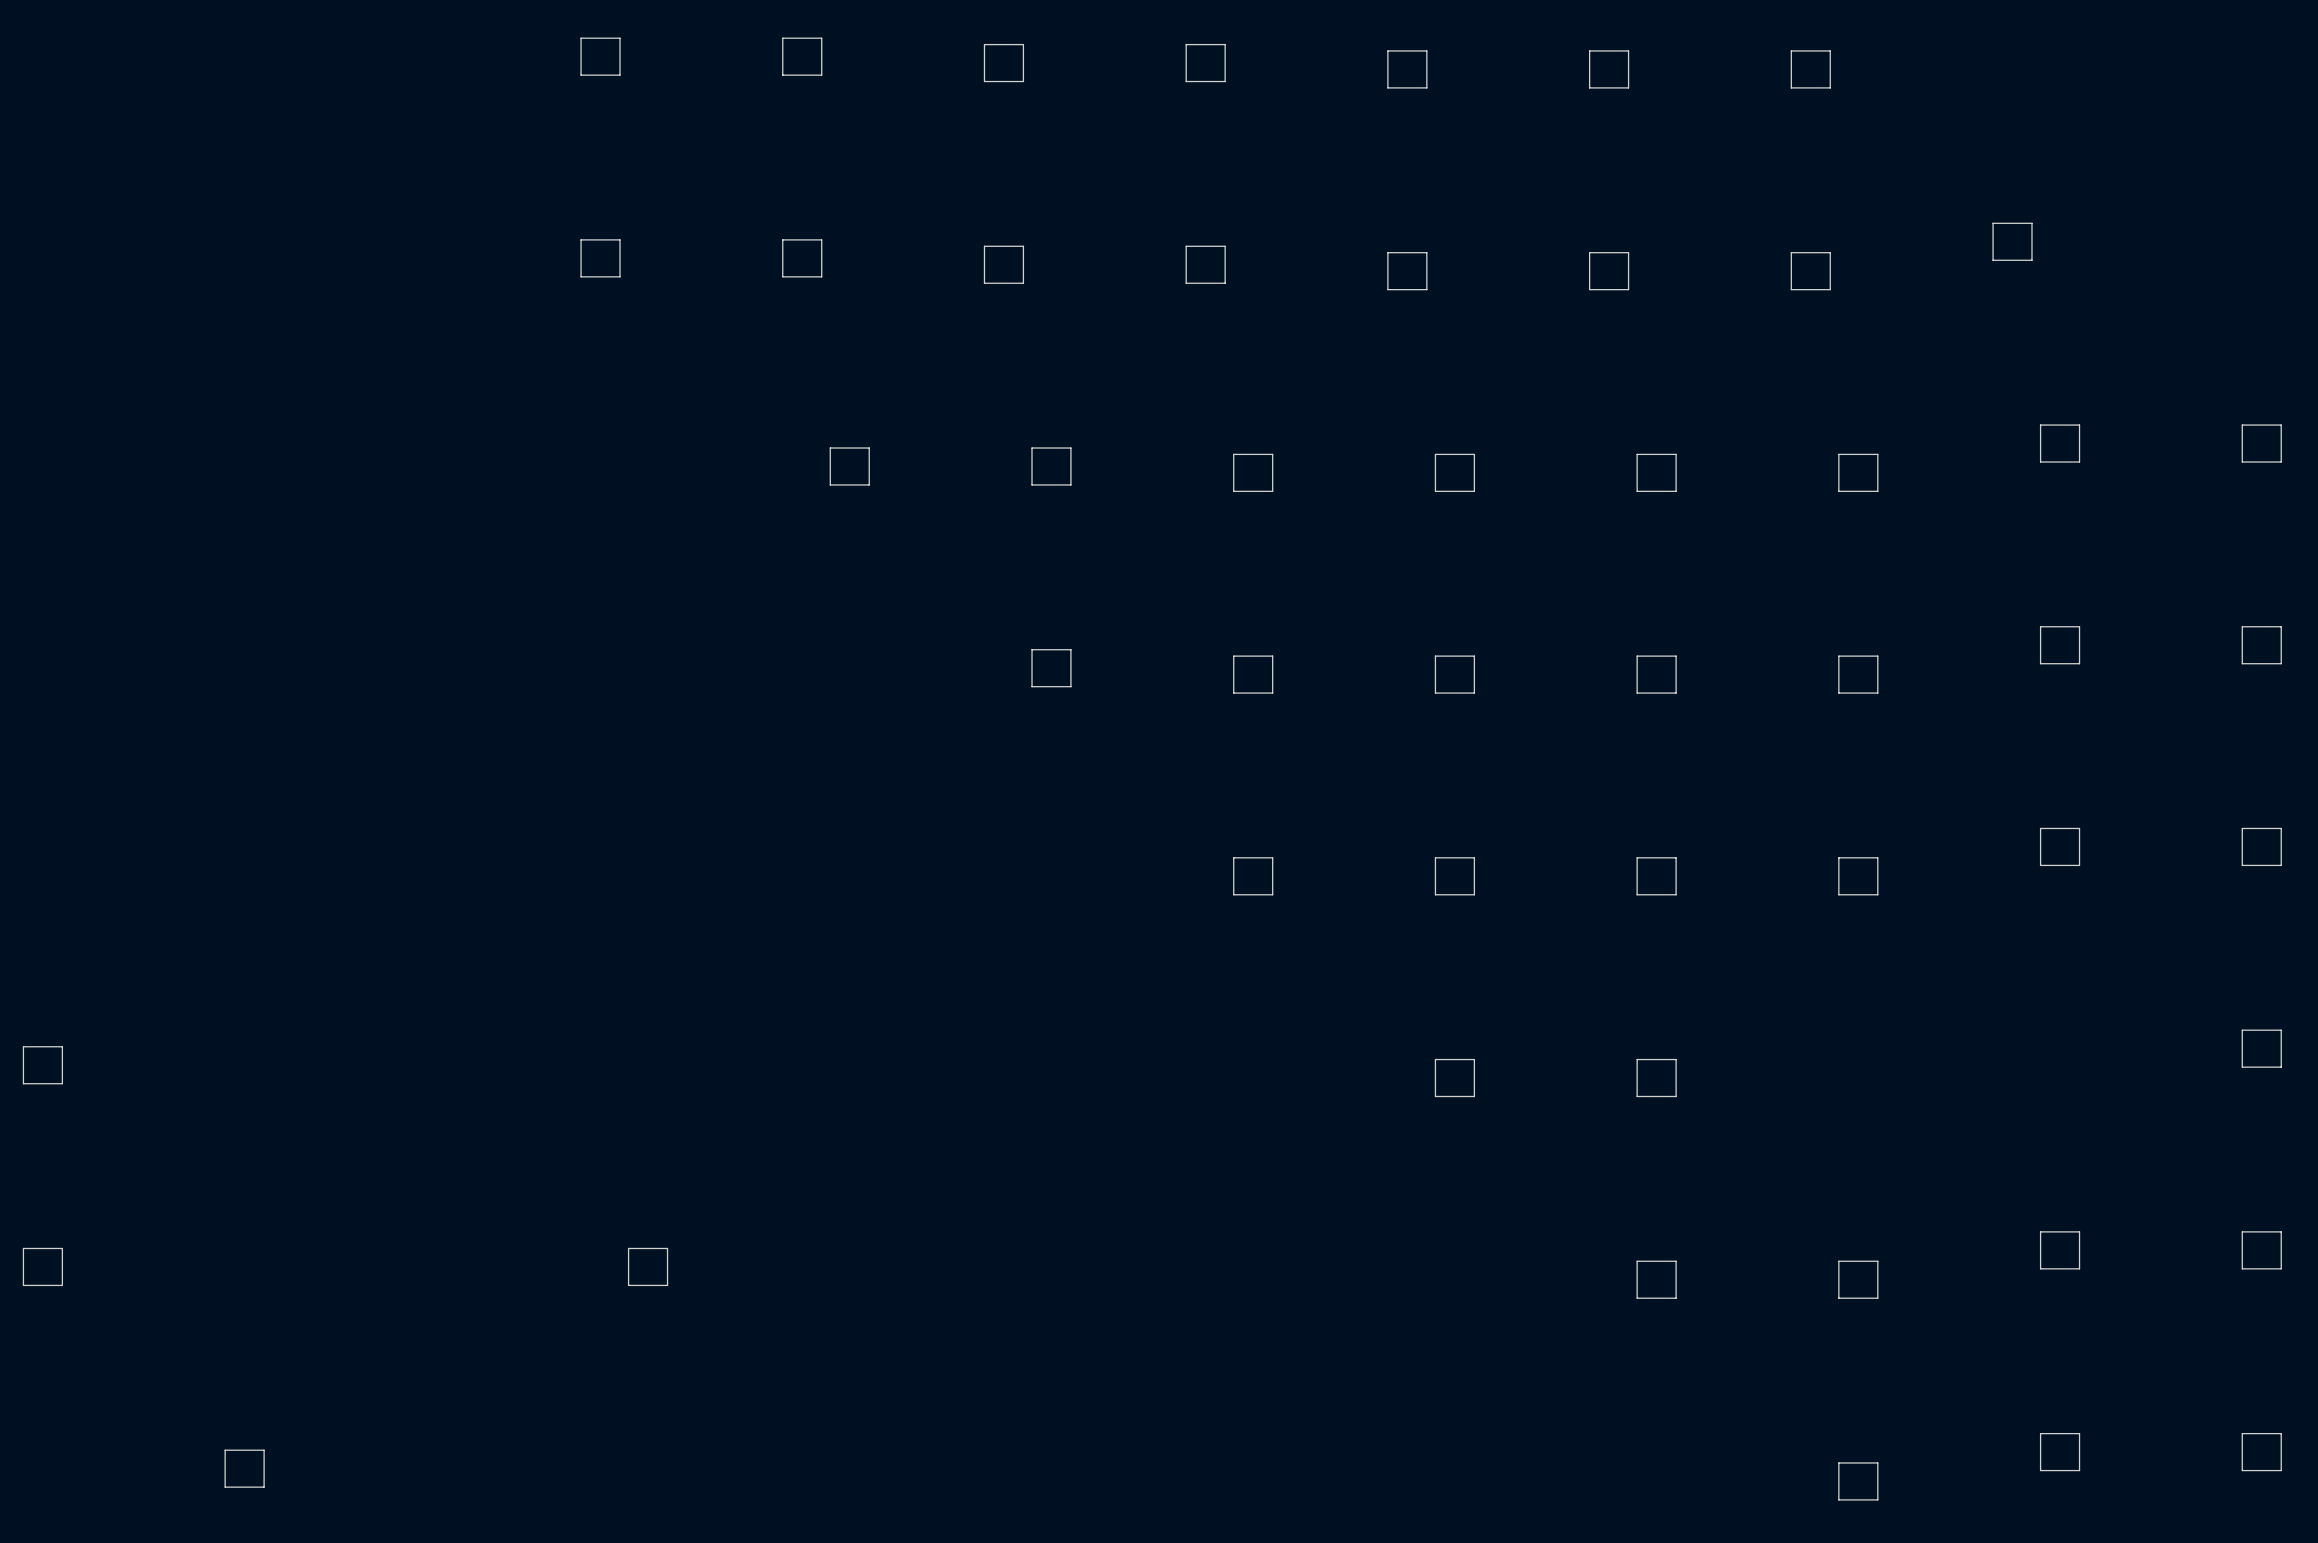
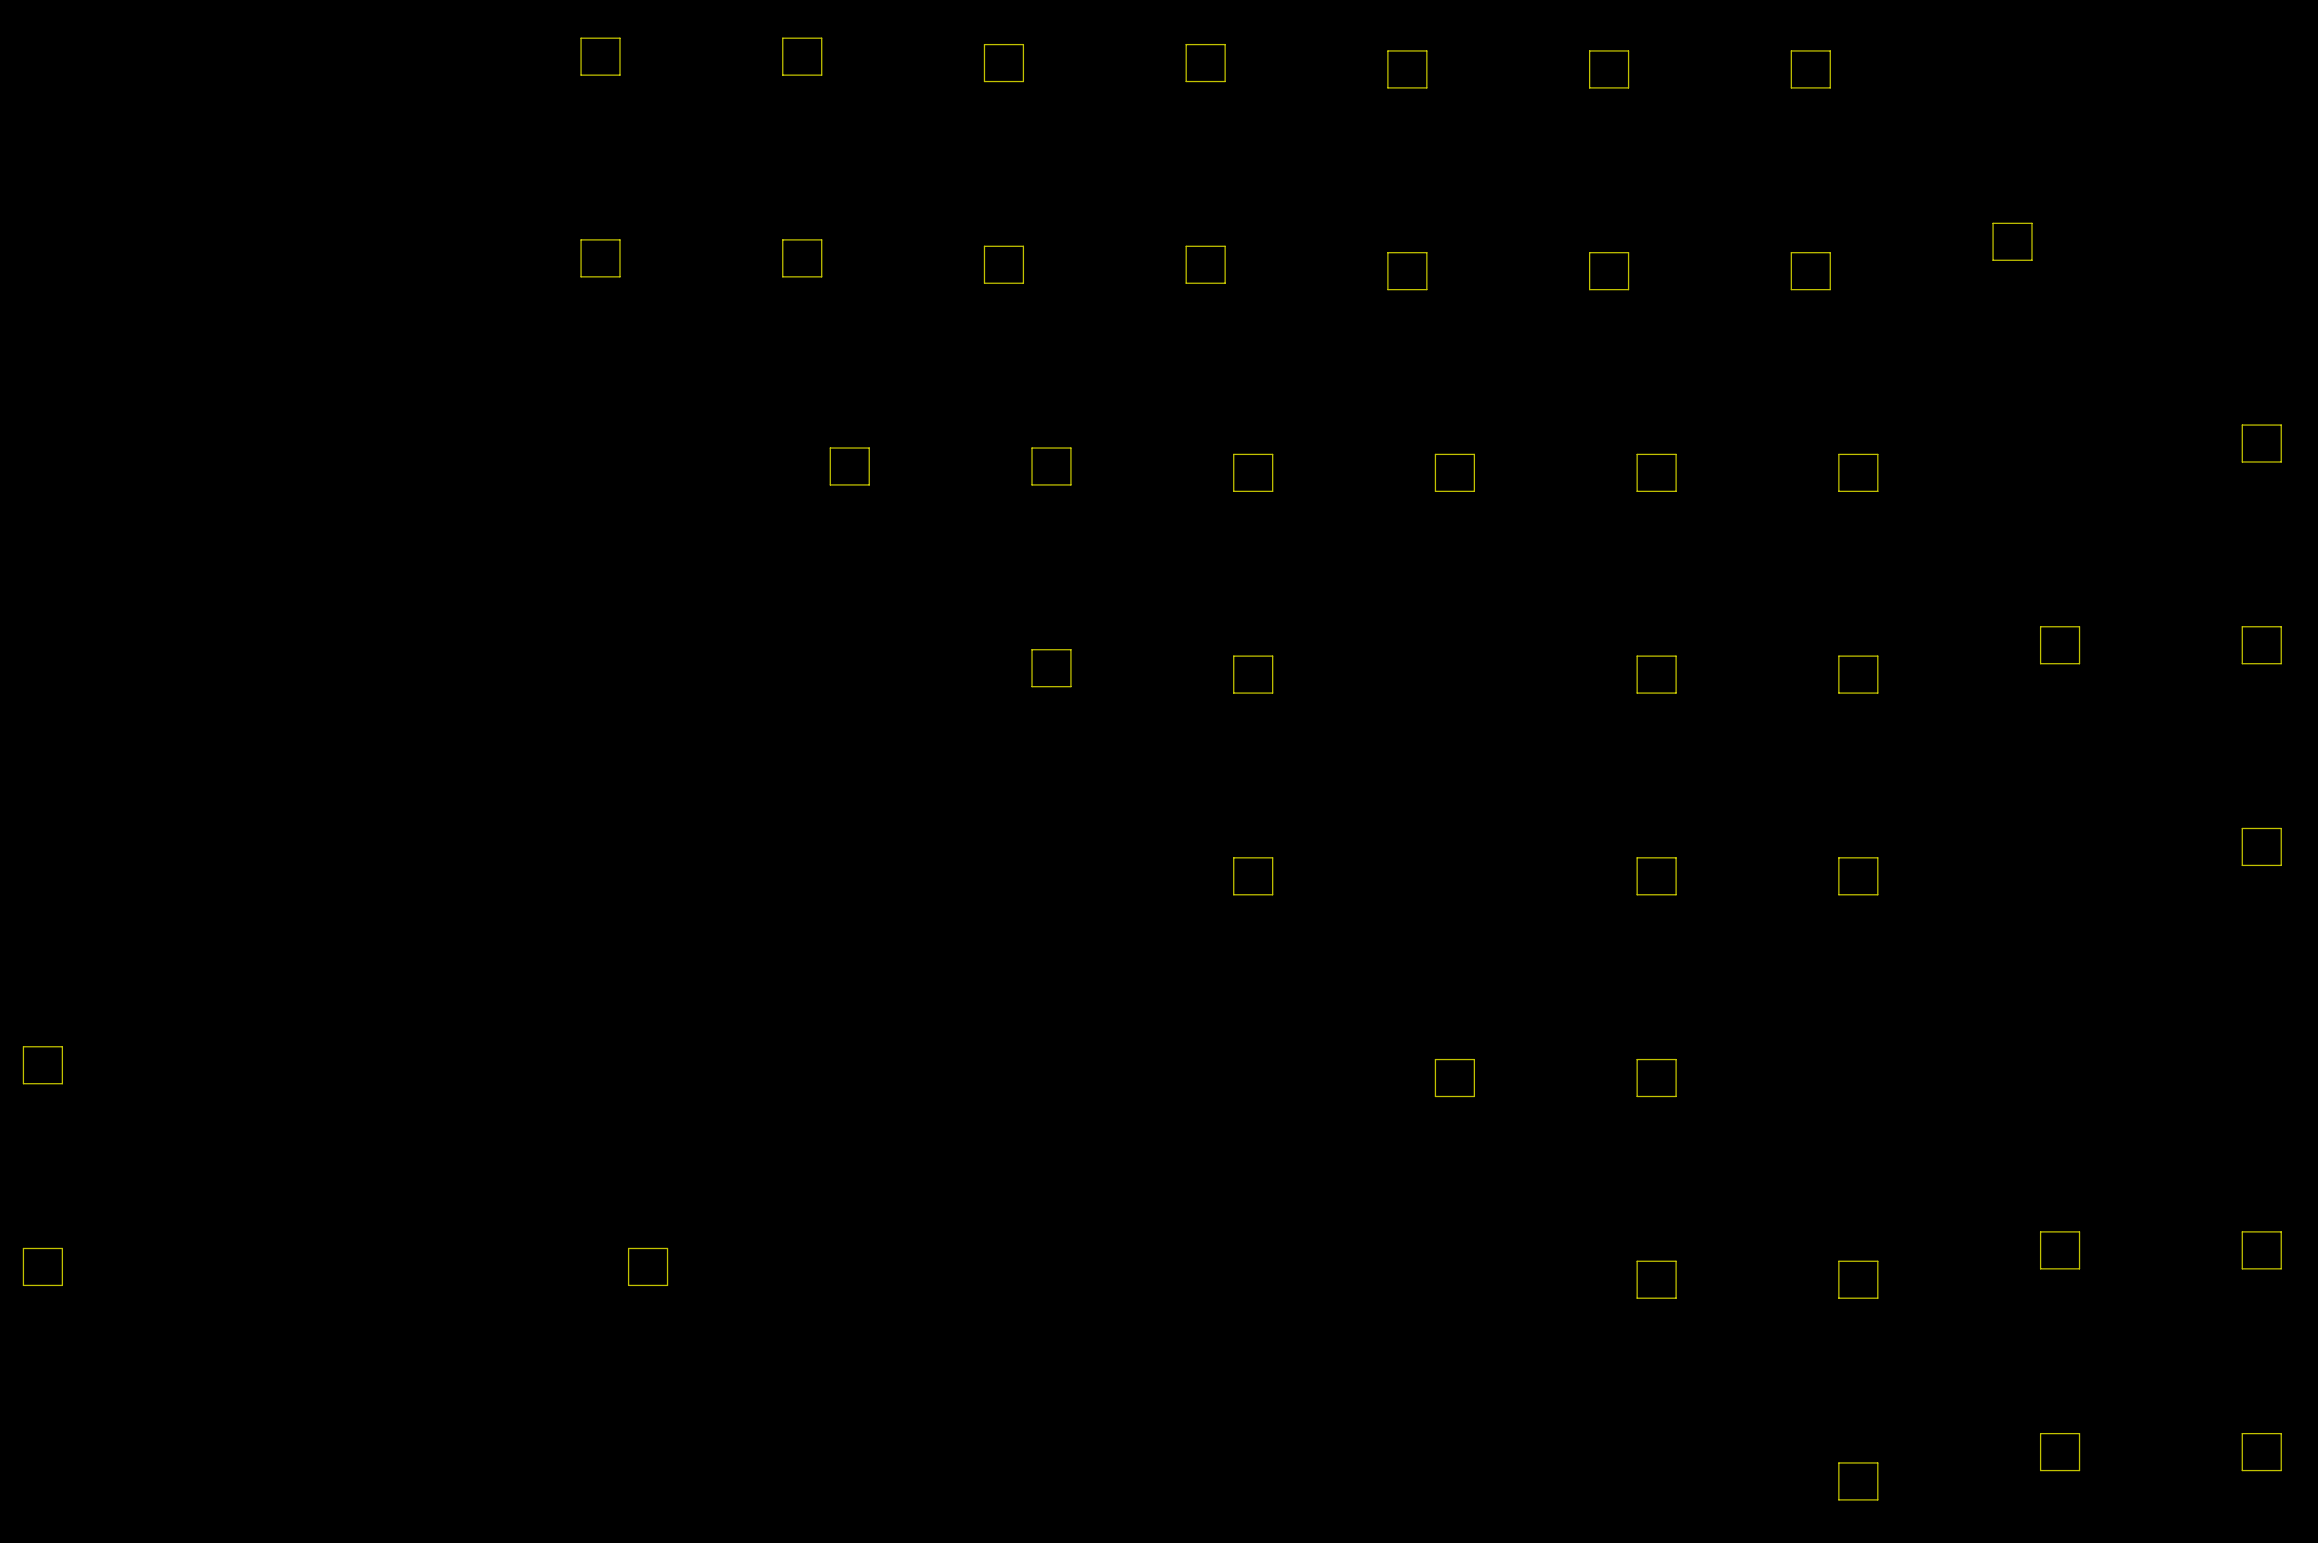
part: (2060, 443) -> none
part: (1454, 674) -> none
part: (2060, 846) -> none
part: (1454, 876) -> none
part: (2261, 1048) -> none
part: (244, 1468) -> none

